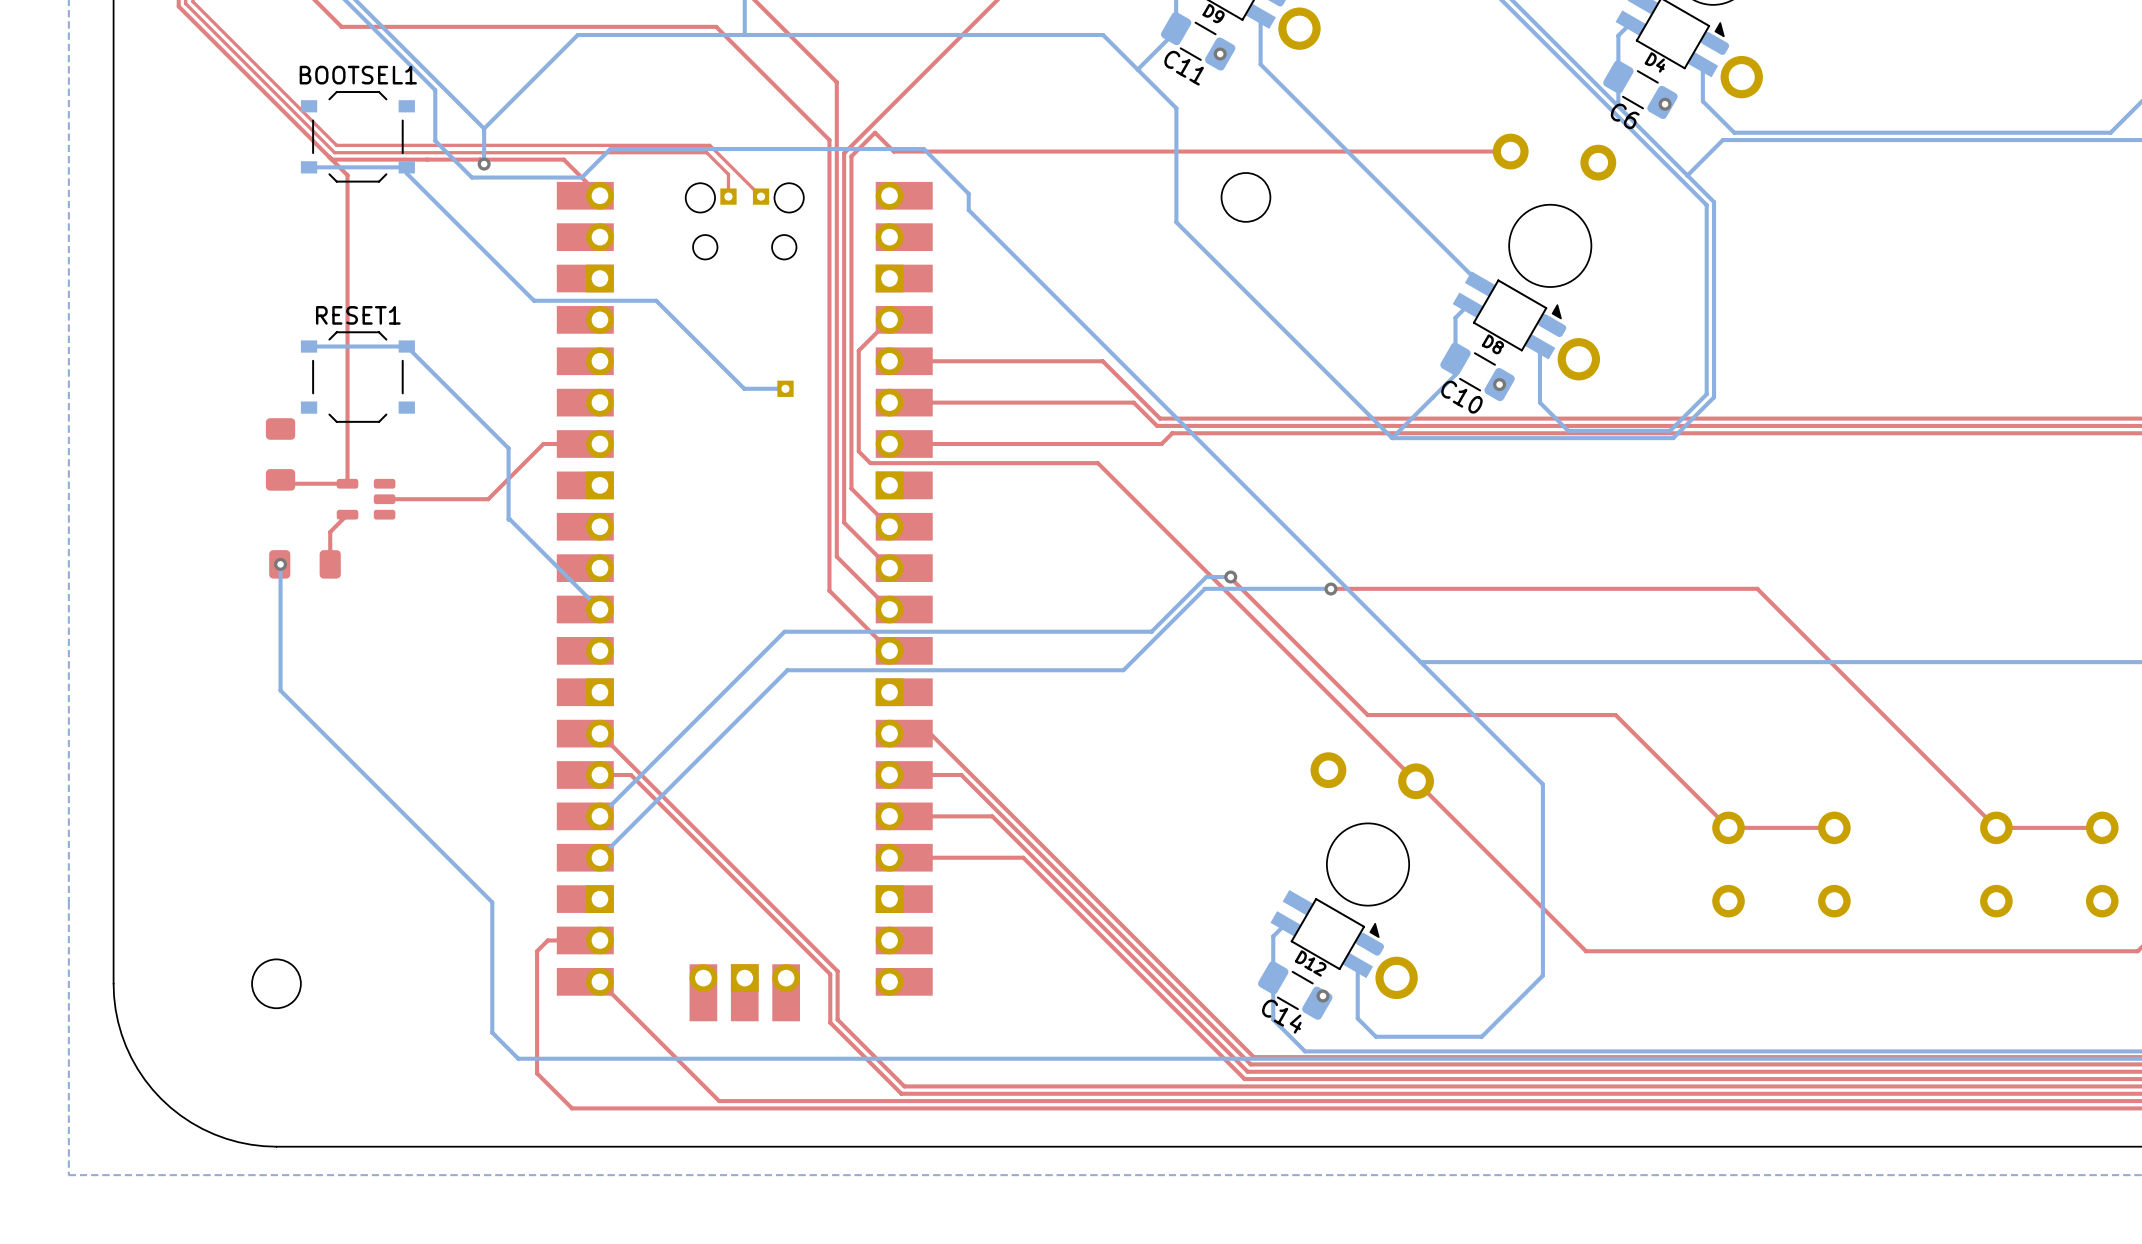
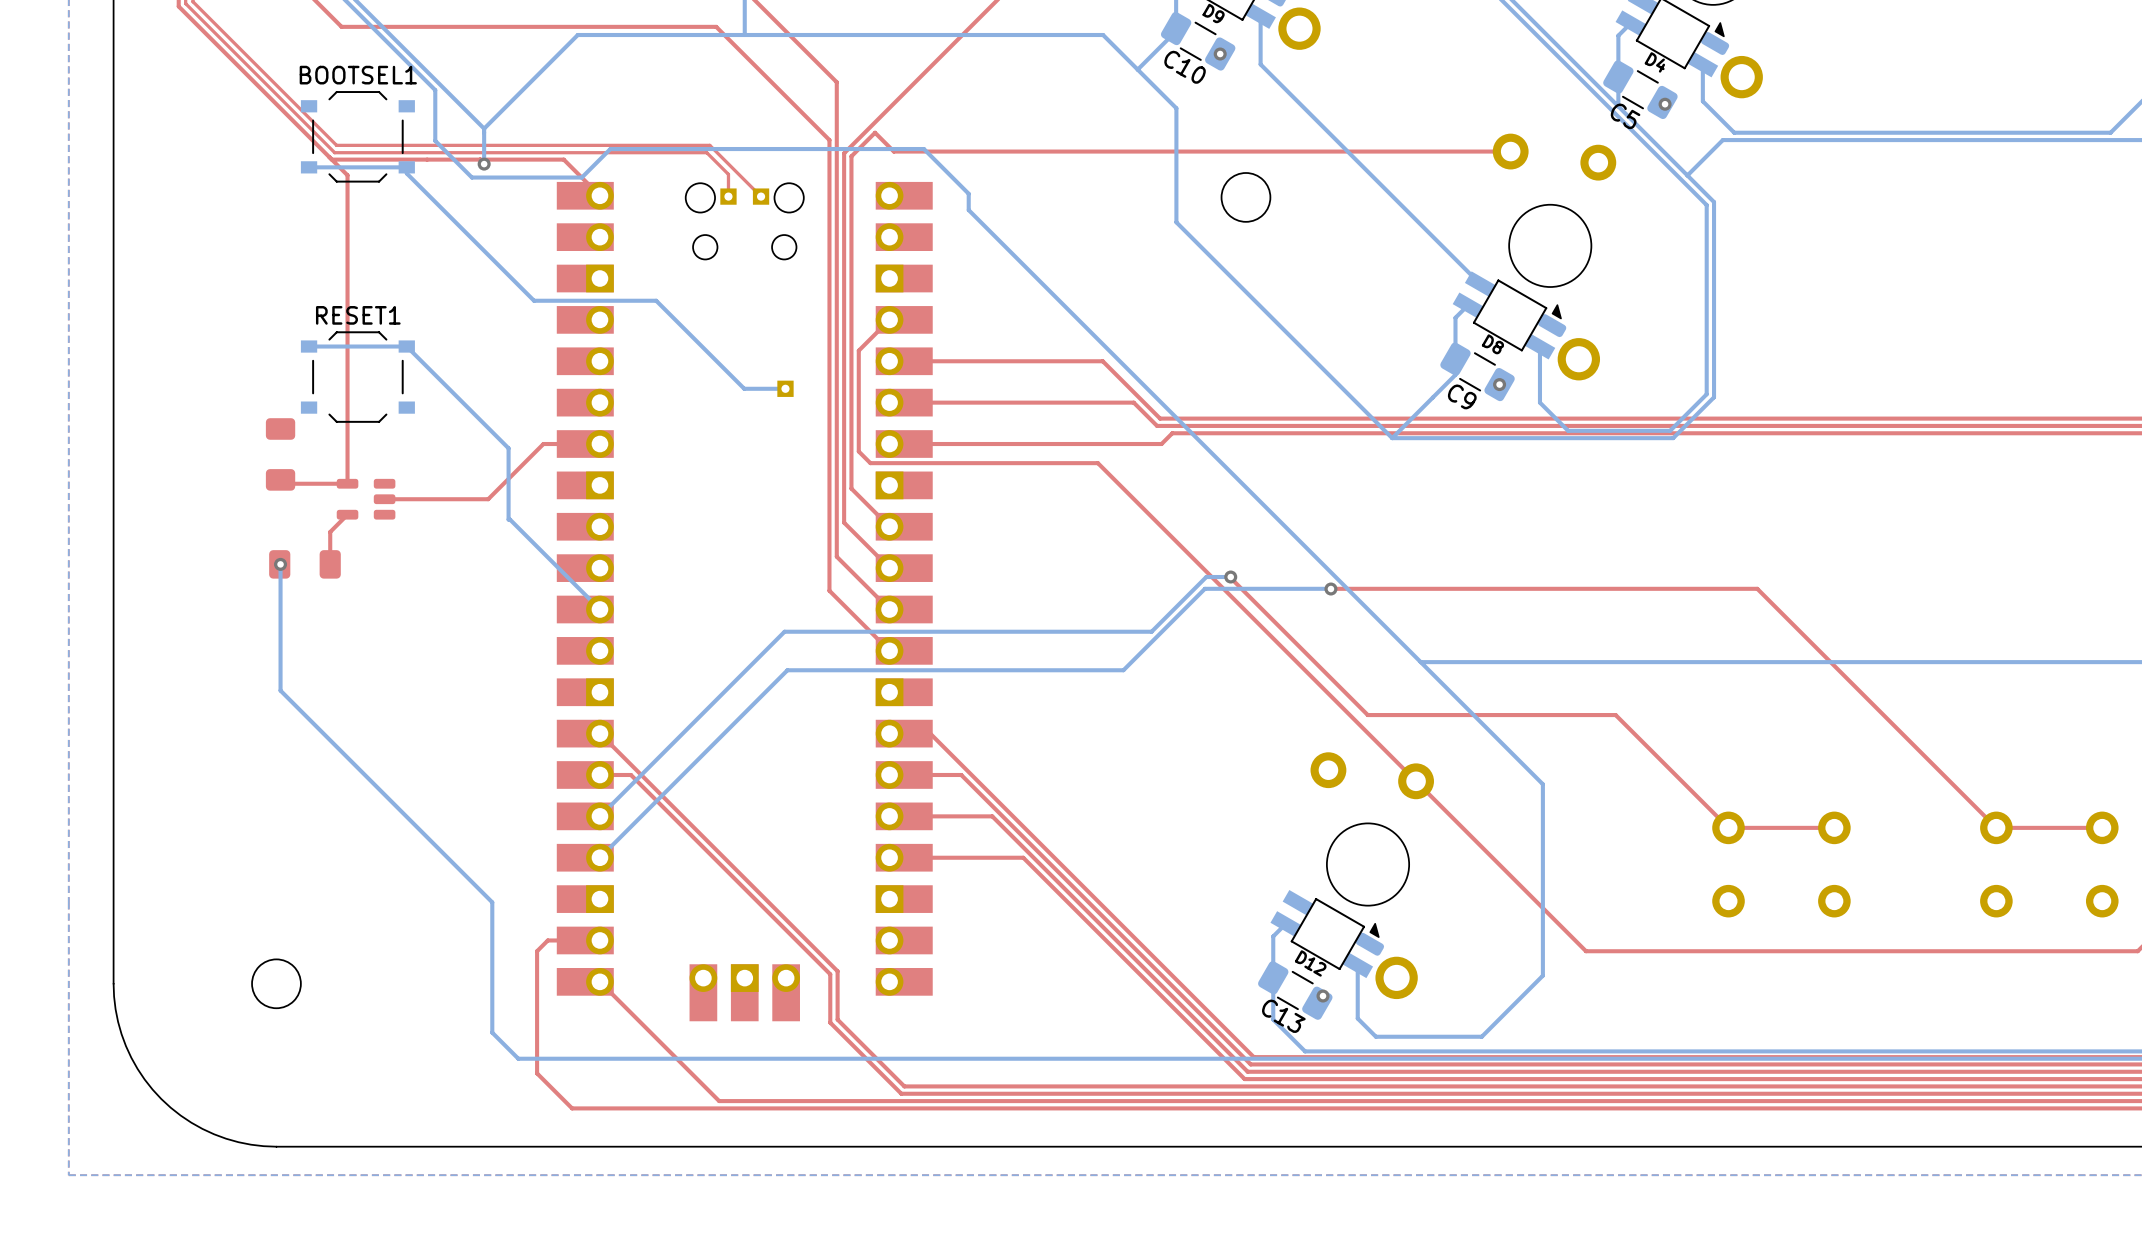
C11 name: C11 (1184, 68) -> C10 (1185, 67)
C6 name: C6 (1625, 116) -> C5 (1625, 116)
C10 name: C10 (1461, 397) -> C9 (1462, 396)
C14 name: C14 (1281, 1016) -> C13 (1283, 1016)

